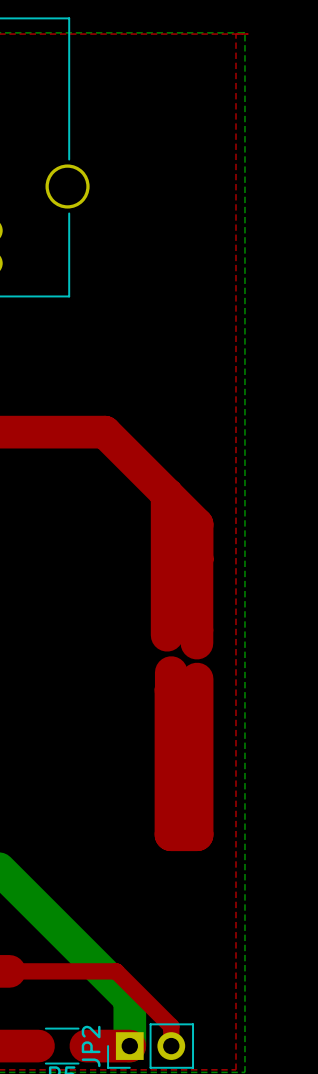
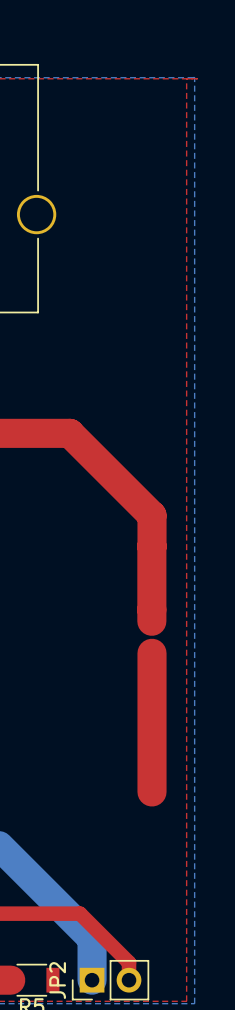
top track: (167, 494) (167, 635) -> none
top track: (171, 672) (170, 834) (197, 834) -> none
top track: (85, 1046) (129, 1046) -> none

